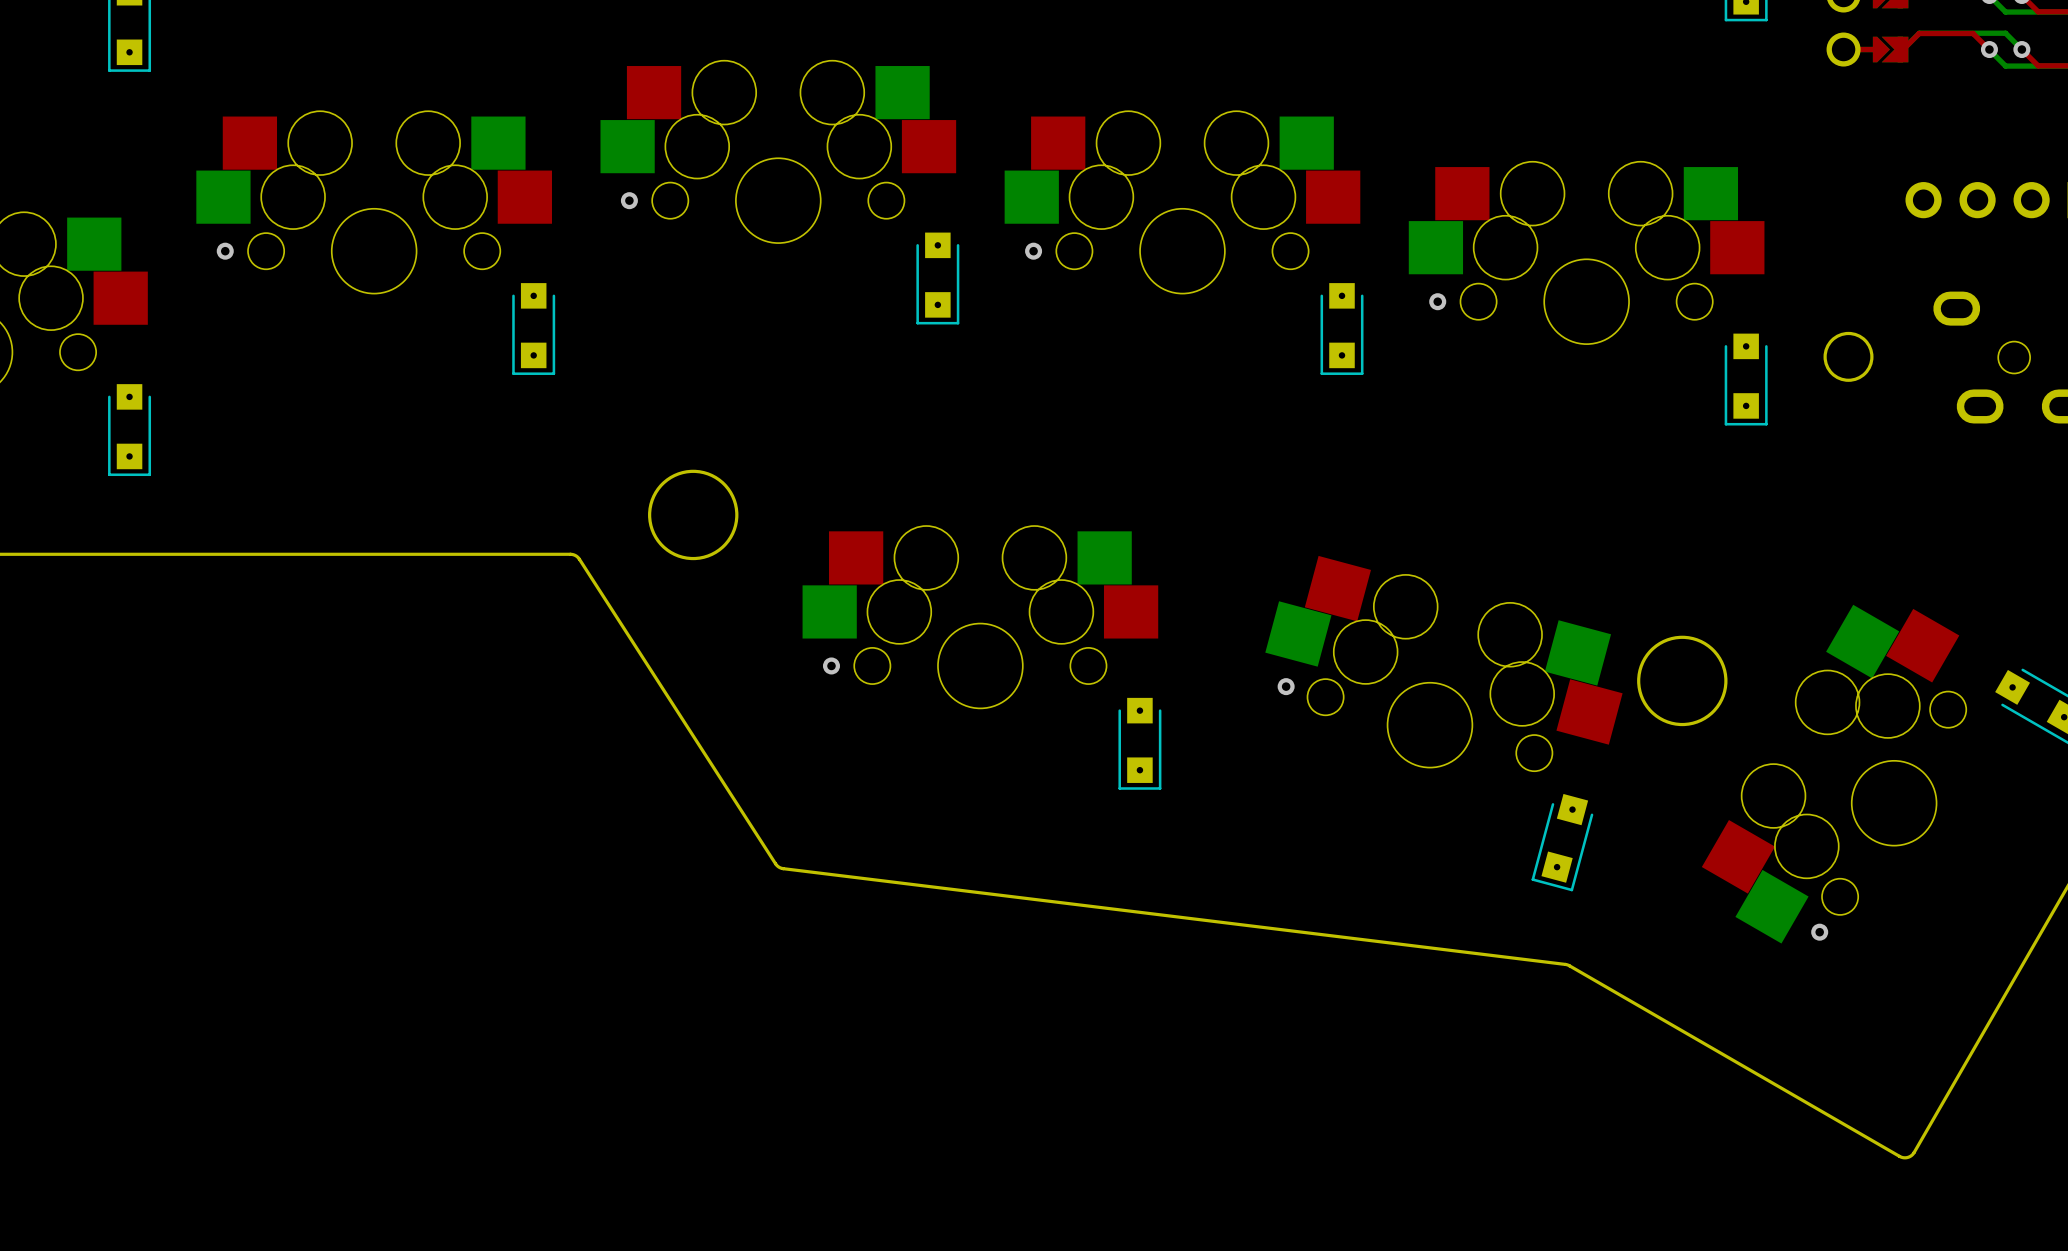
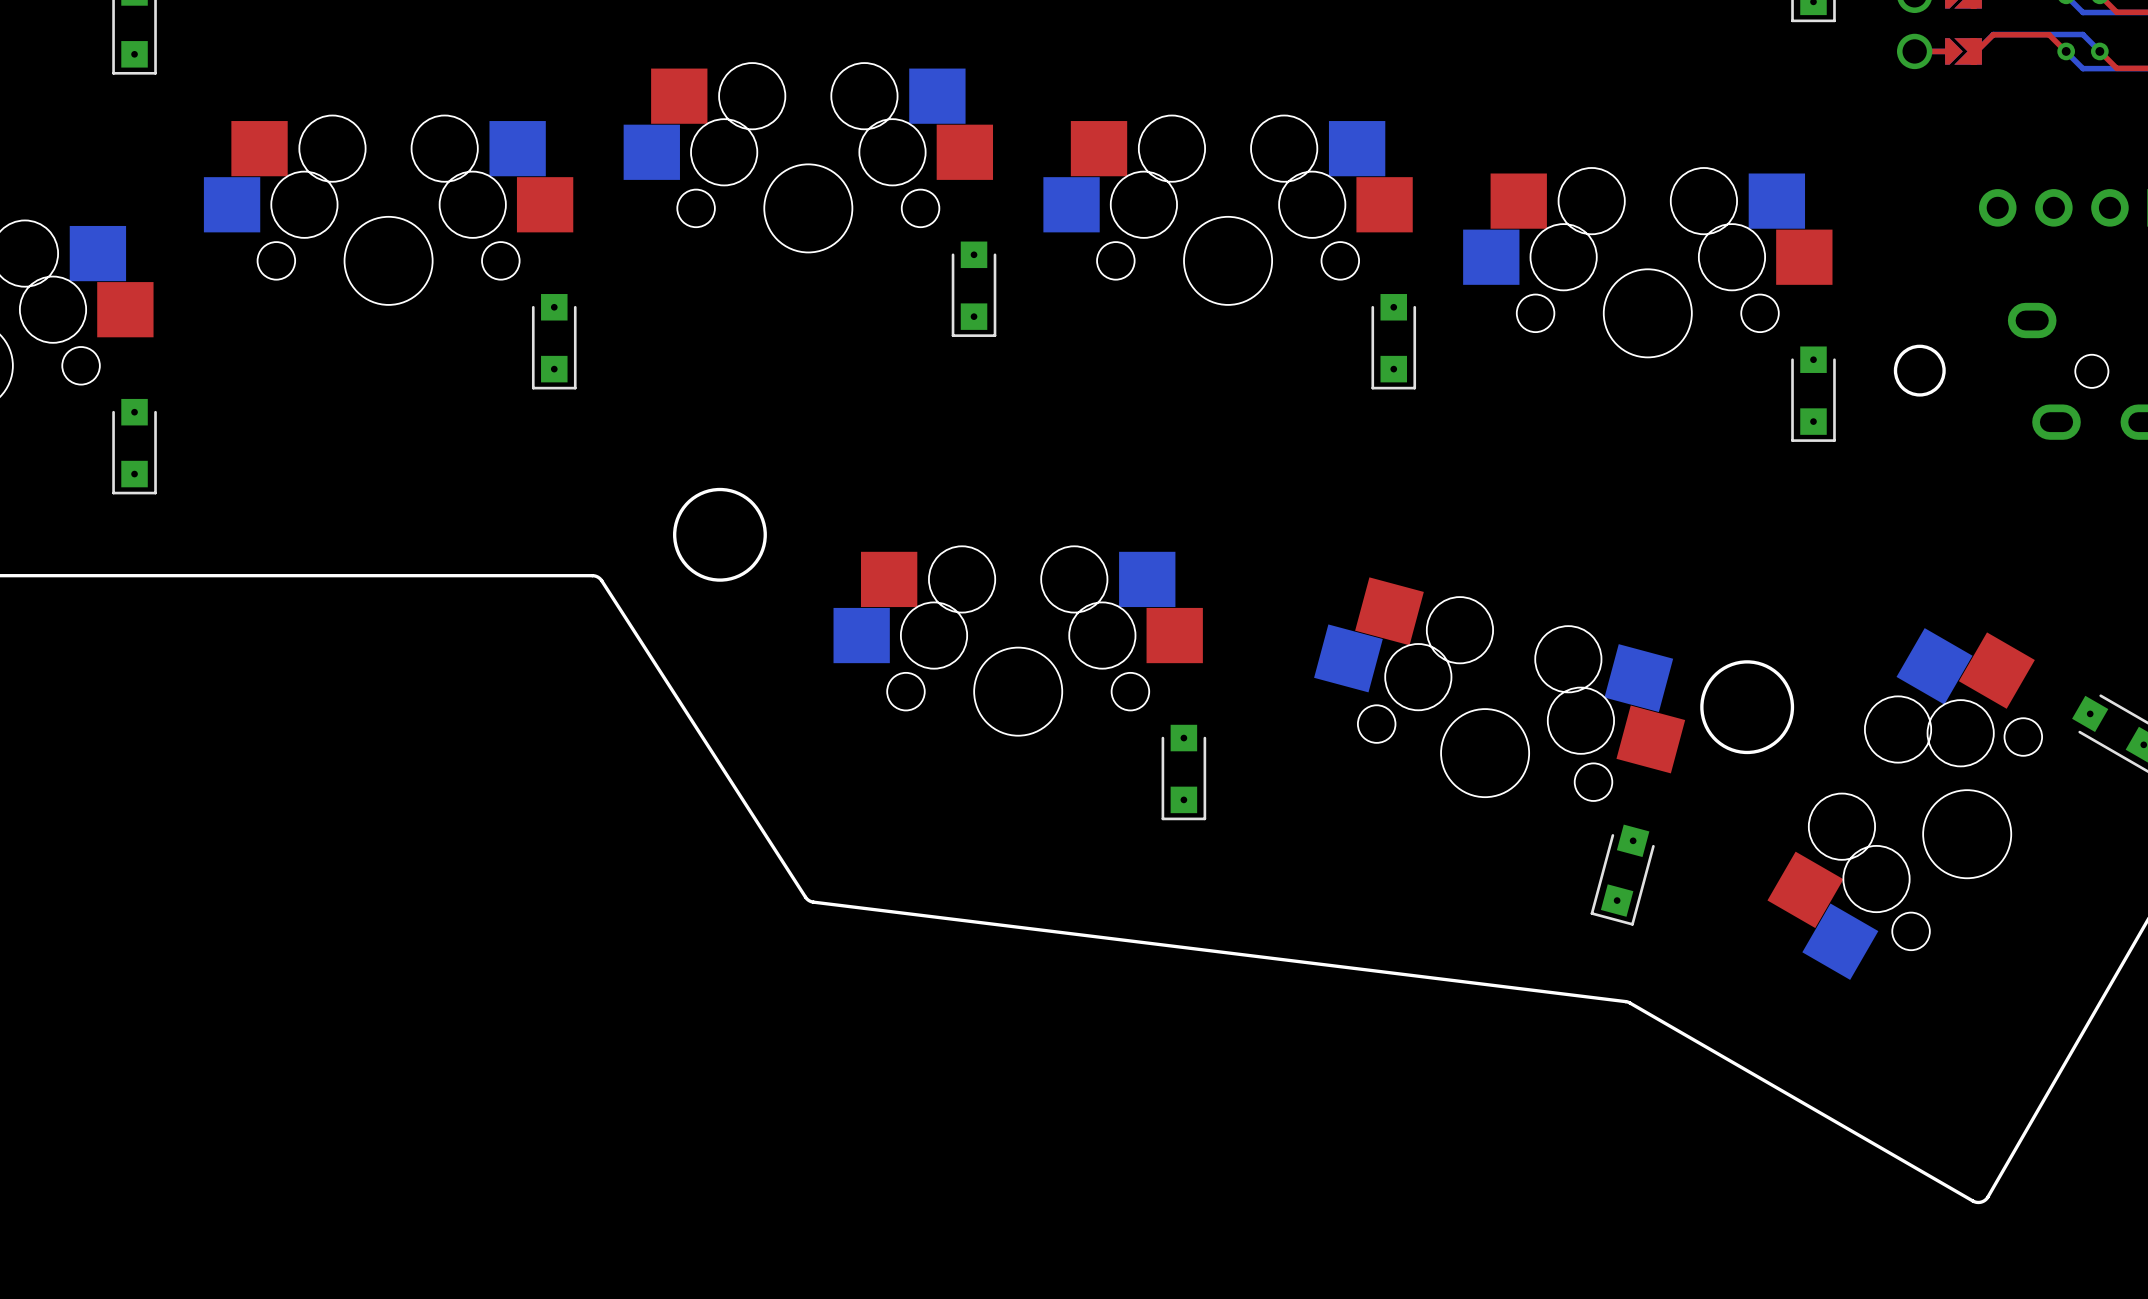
via: (629, 200) -> none
via: (225, 251) -> none
via: (1033, 251) -> none
via: (1437, 301) -> none
via: (831, 665) -> none
via: (1286, 686) -> none
via: (1819, 932) -> none

